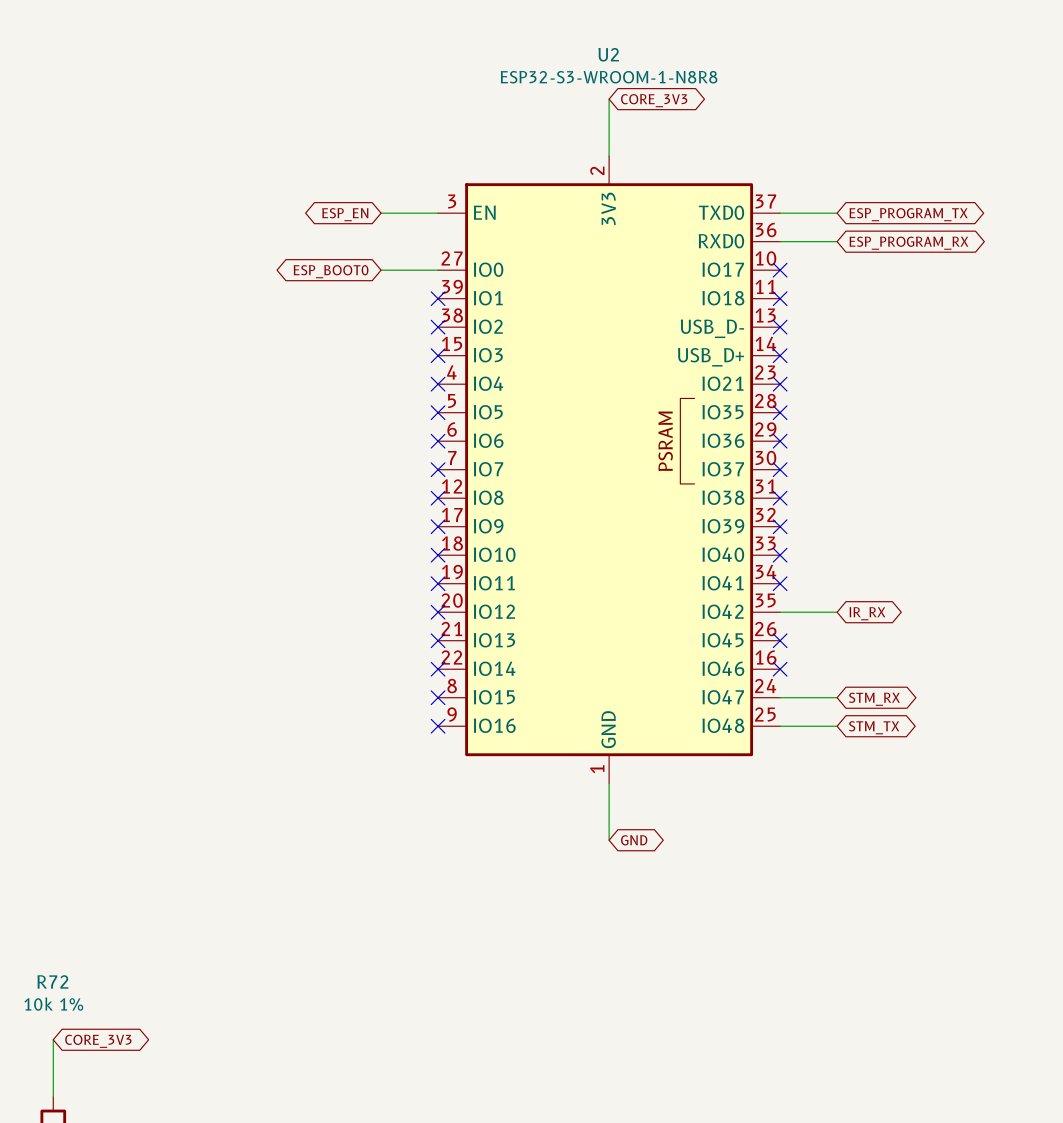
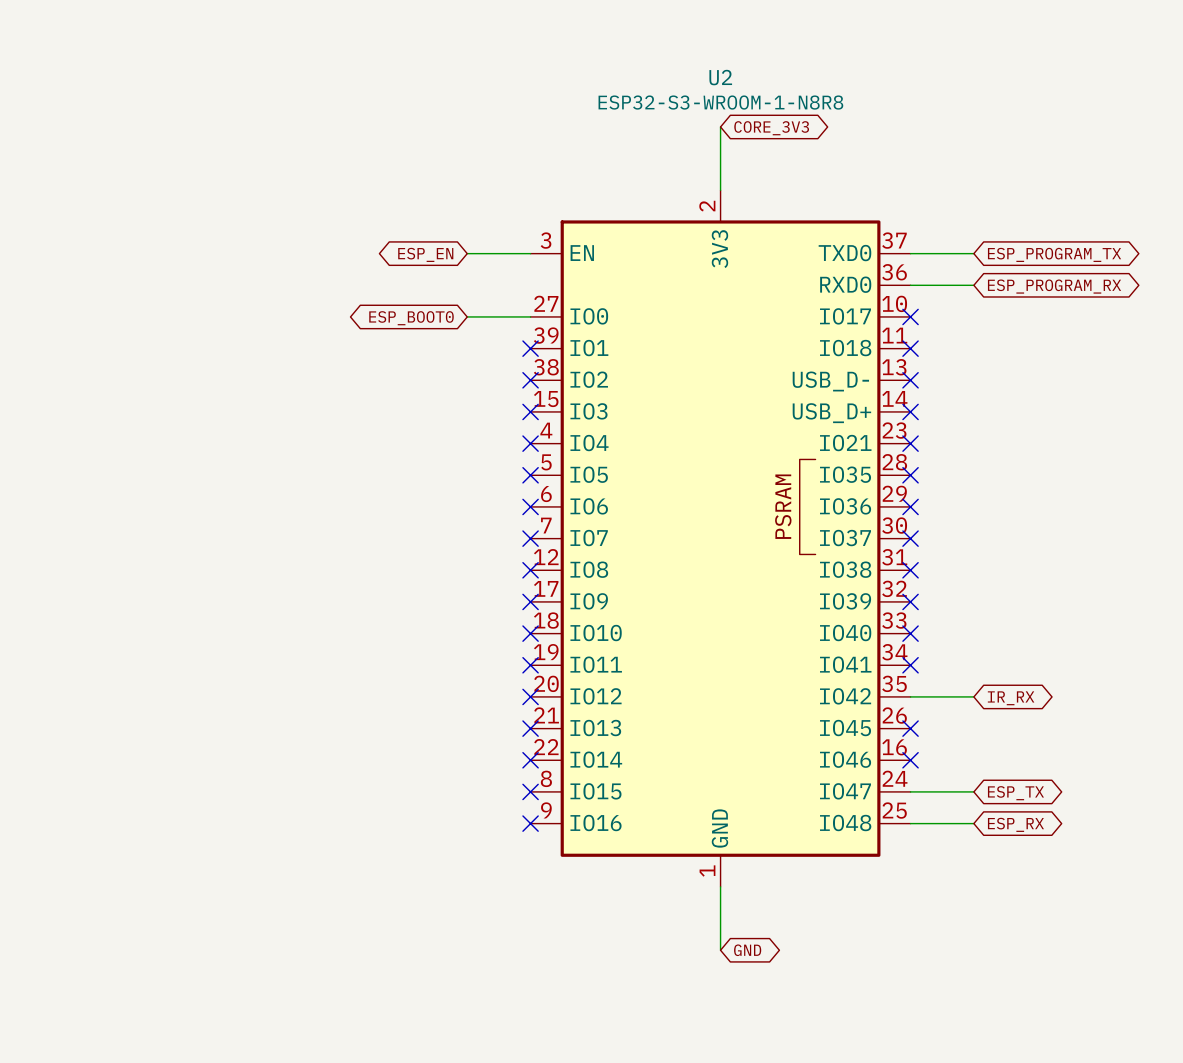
global label: STM_RX (874, 699) -> ESP_TX (1015, 793)
global label: STM_TX (874, 727) -> ESP_RX (1015, 824)

